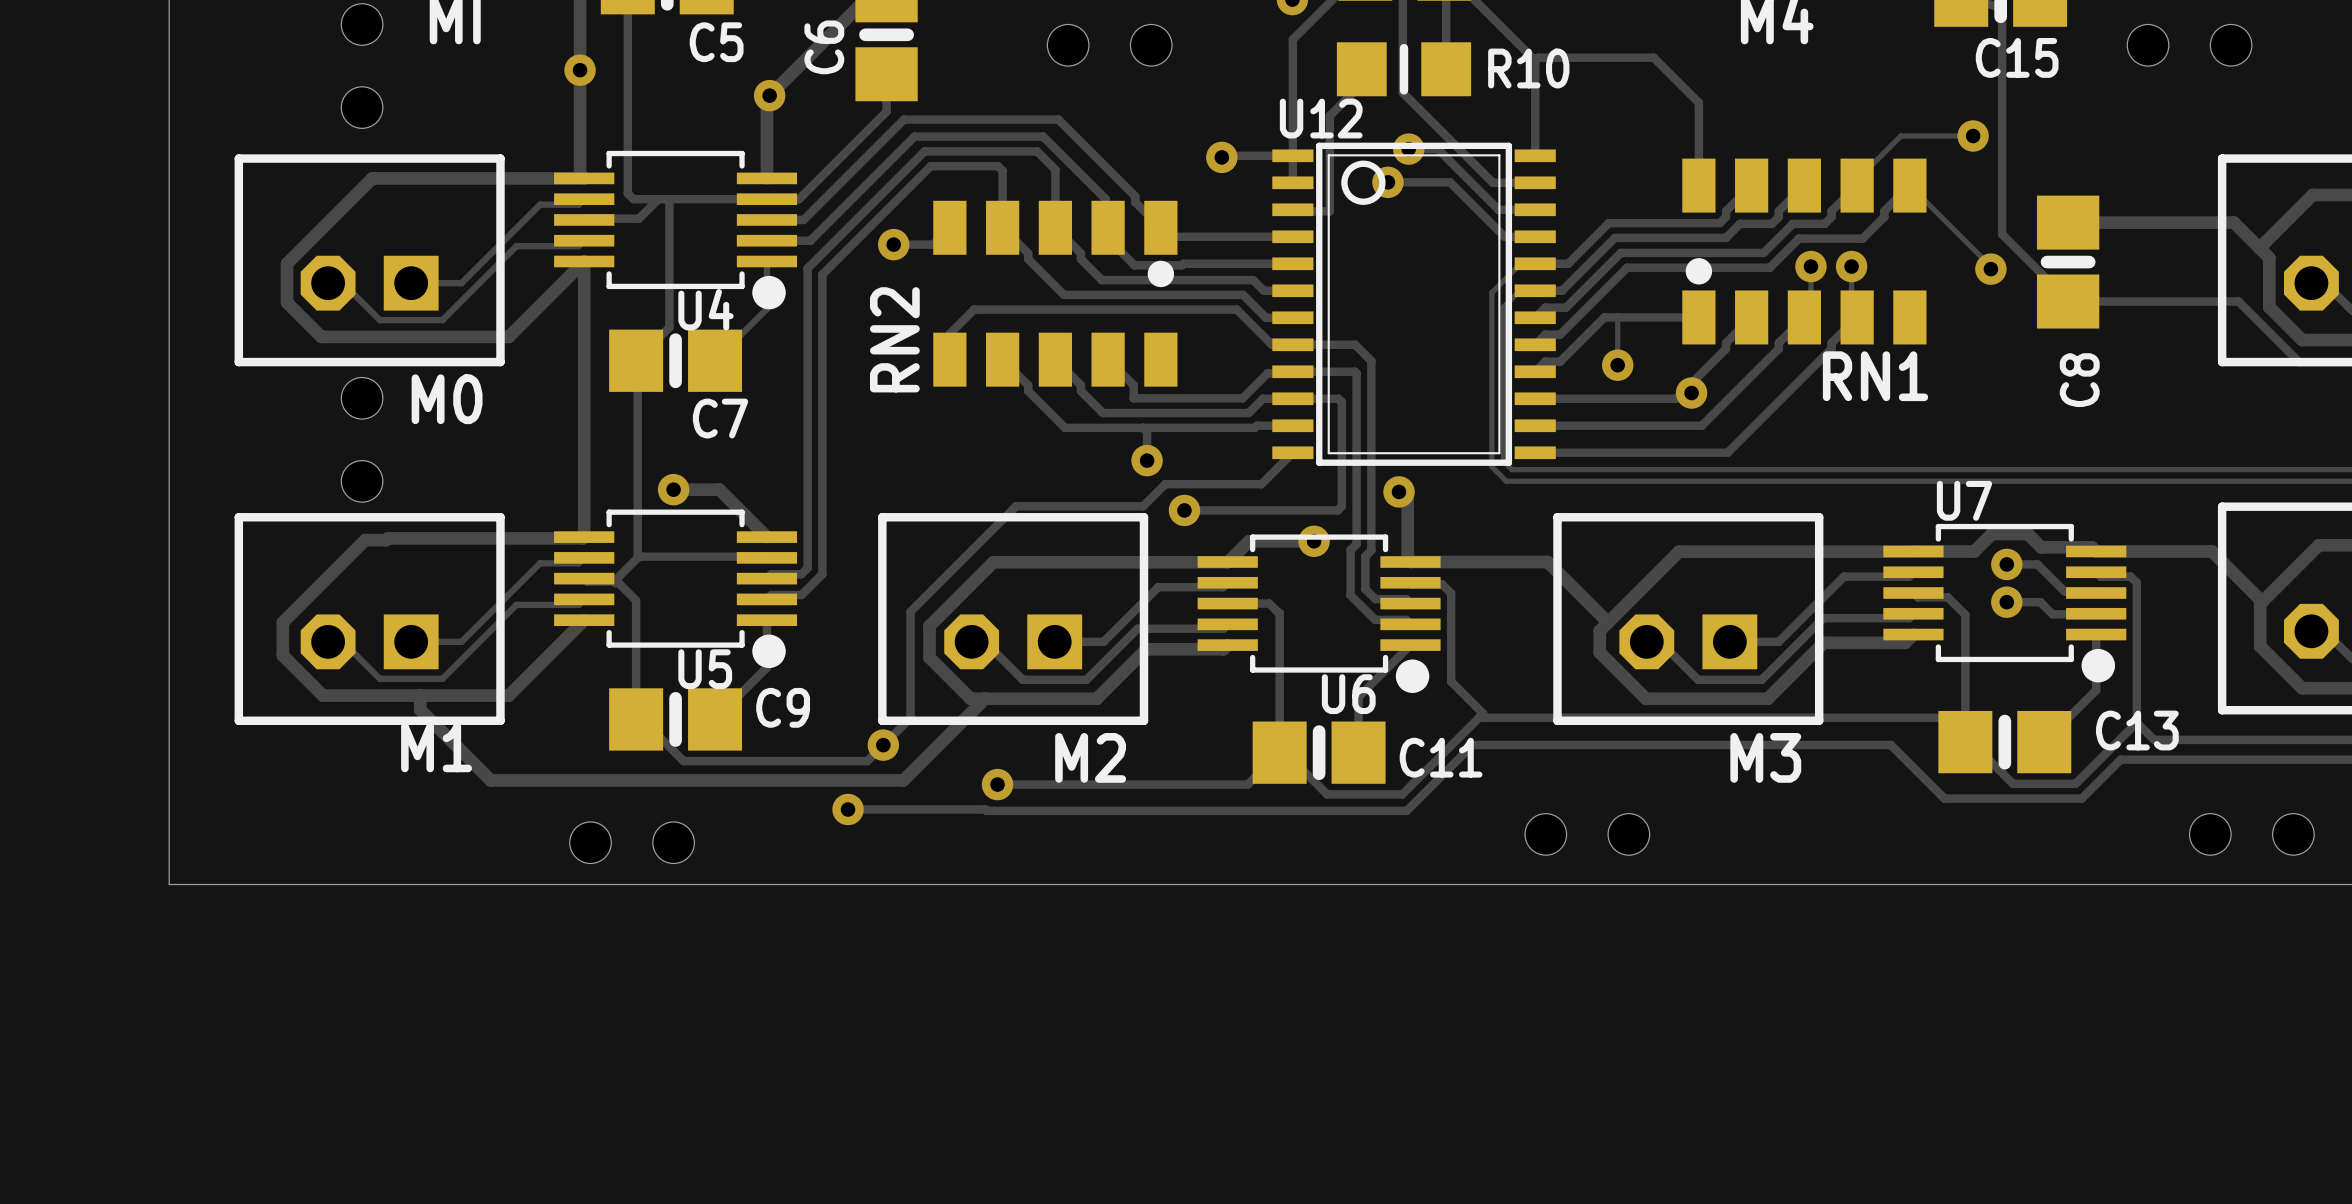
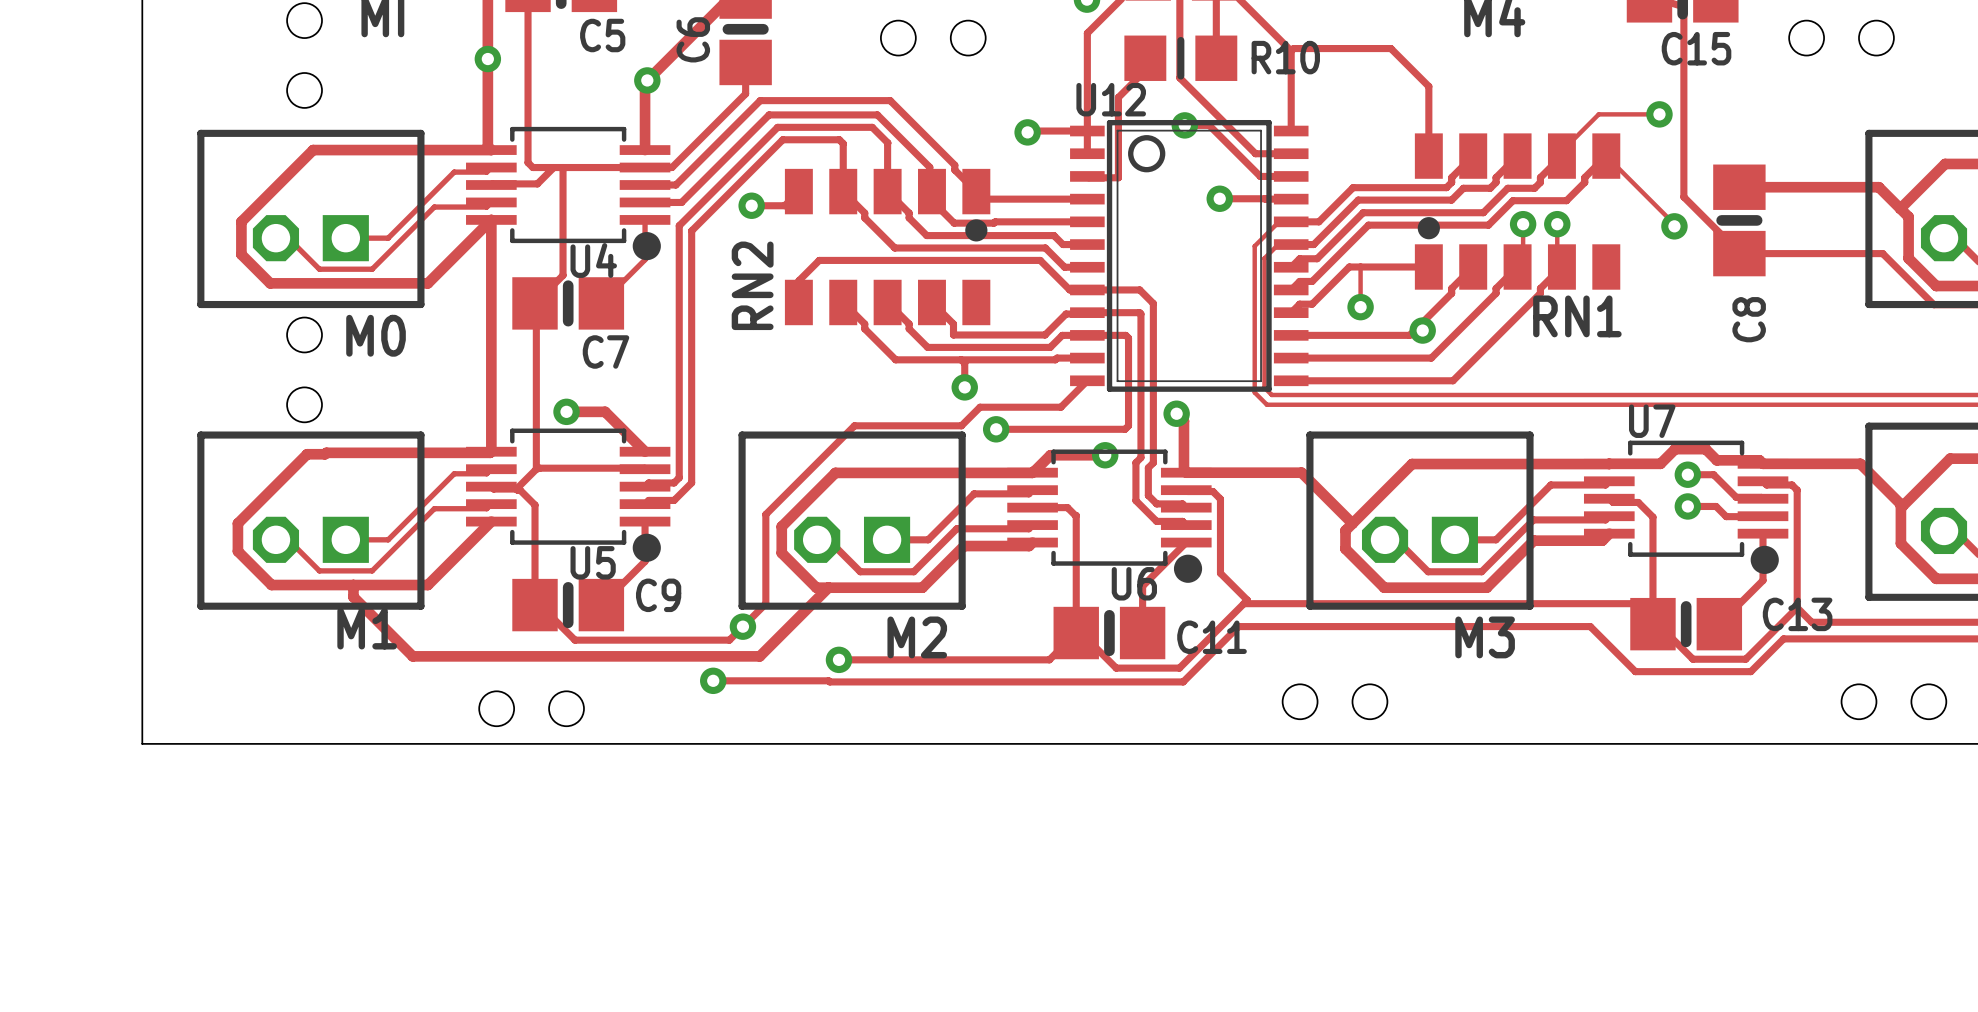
track: (1387, 182) (1450, 182) (1504, 236) -> (1219, 198) (1265, 198)
via position: (1387, 182) -> (1219, 198)

